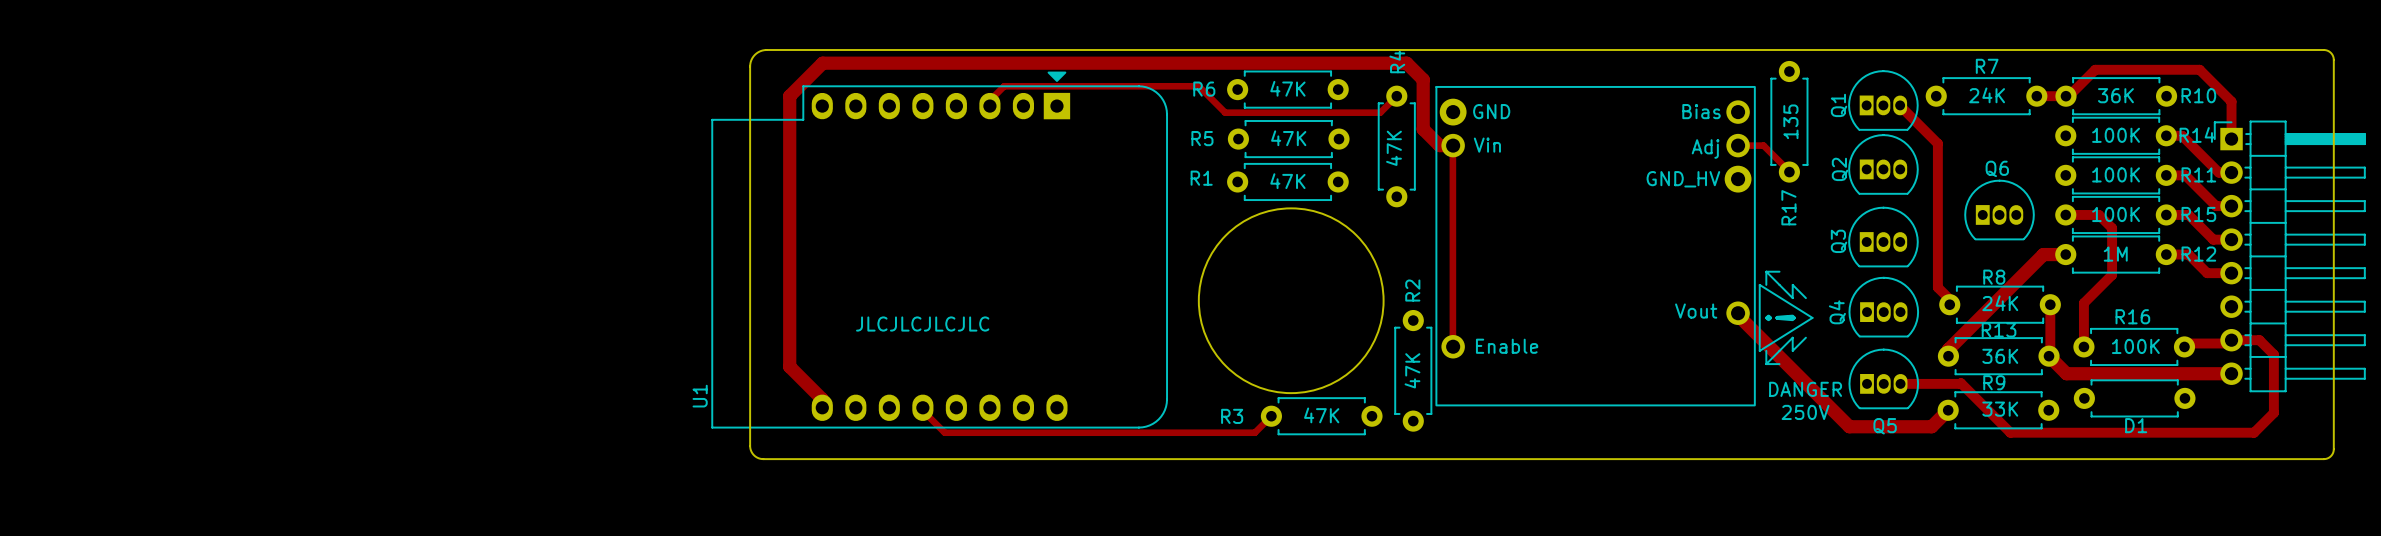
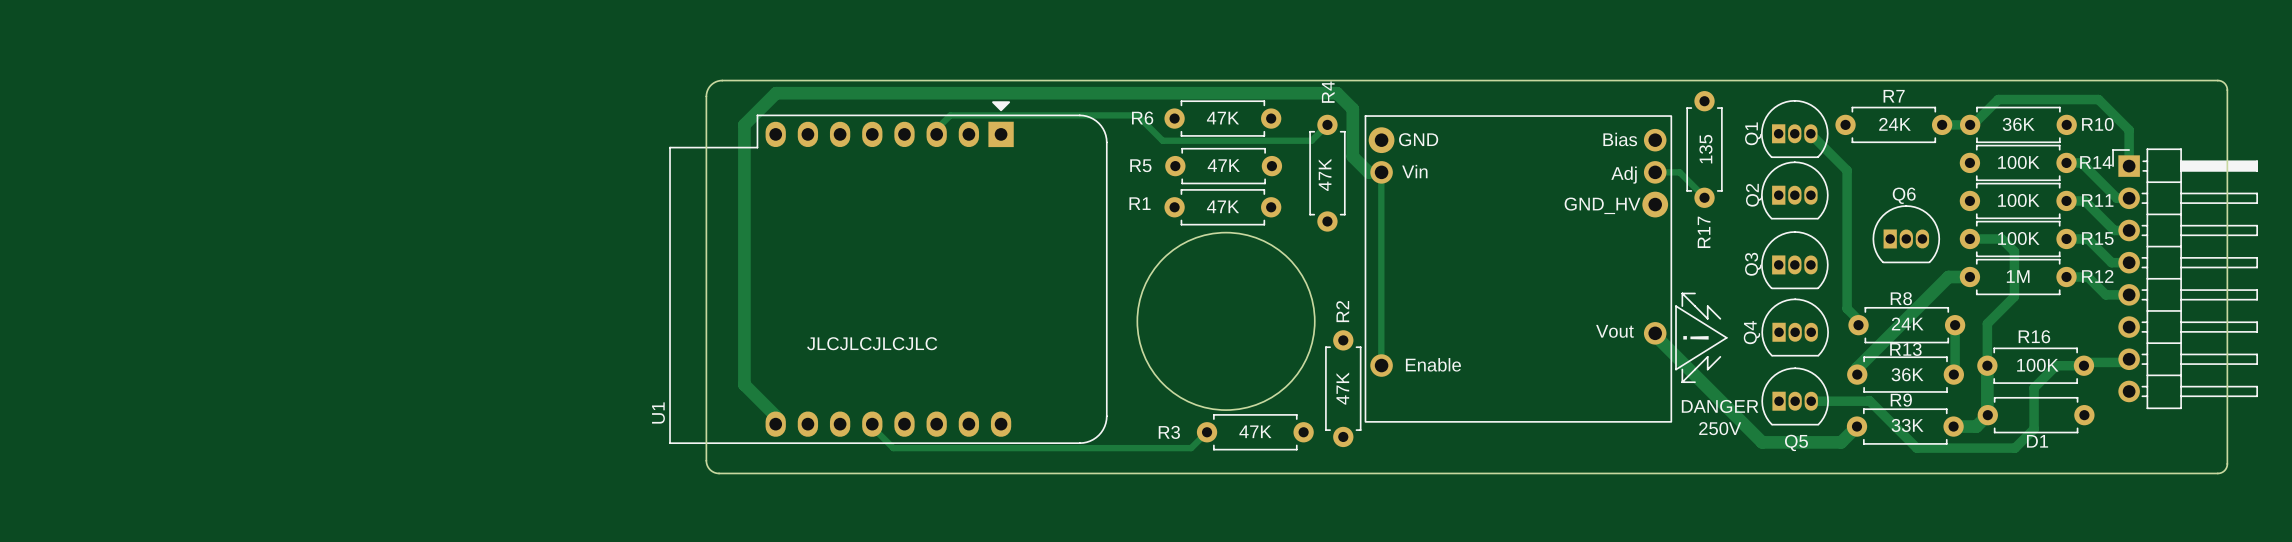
track: (2231, 340) (2259, 340) (2273, 354) (2273, 412) (2254, 432) (2112, 432) -> (2083, 365) (2056, 365) (2034, 387) (2034, 429) (2015, 448)
track: none -> (1987, 365) (1987, 415) (1976, 426) (1953, 426)
track: (2049, 356) (2066, 373) (2231, 373) -> none

